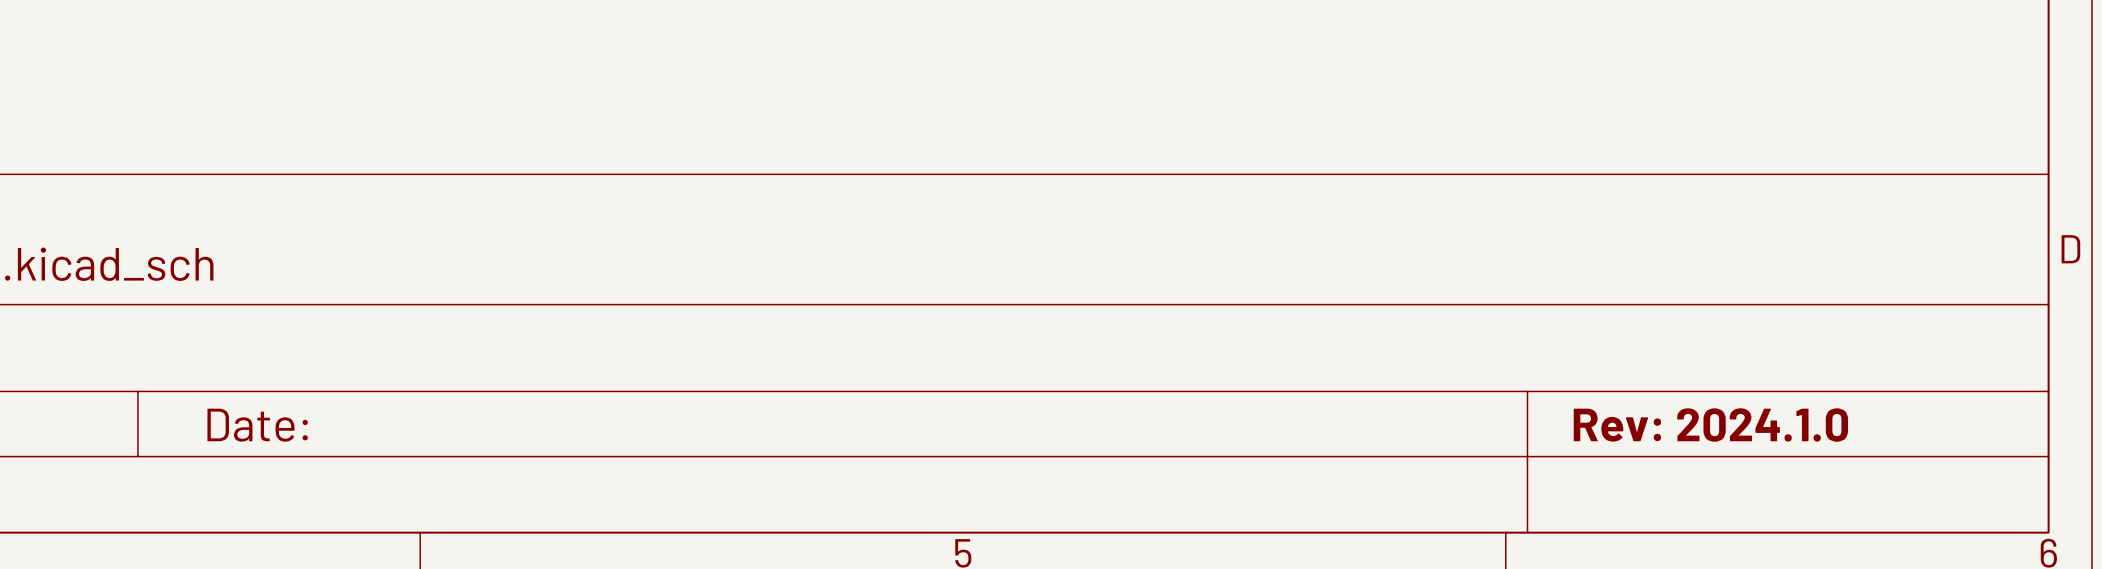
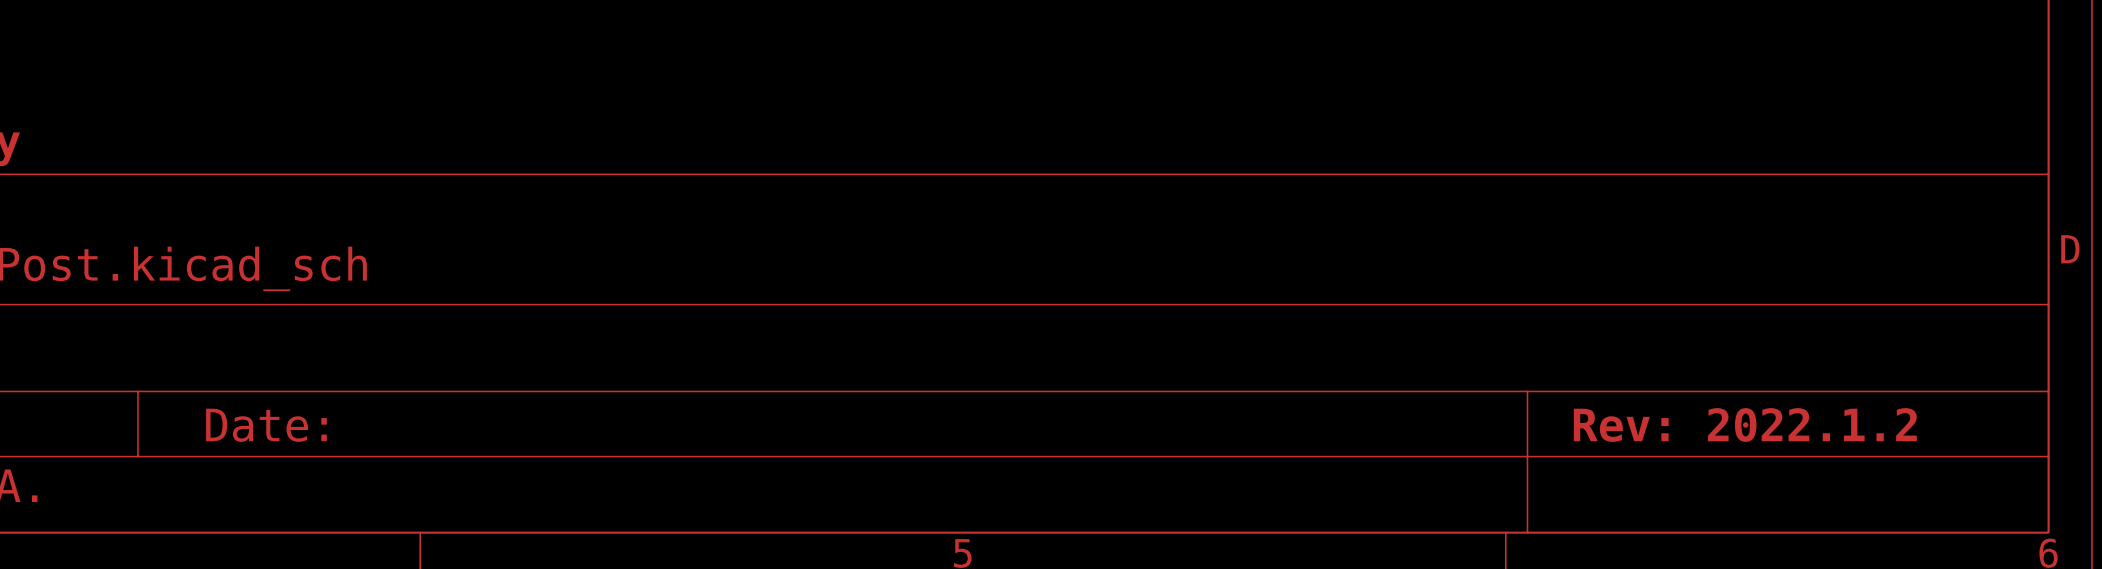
title block: Rev: 2024.1.0 (1710, 425) -> Rev: 2022.1.2 (1745, 424)

